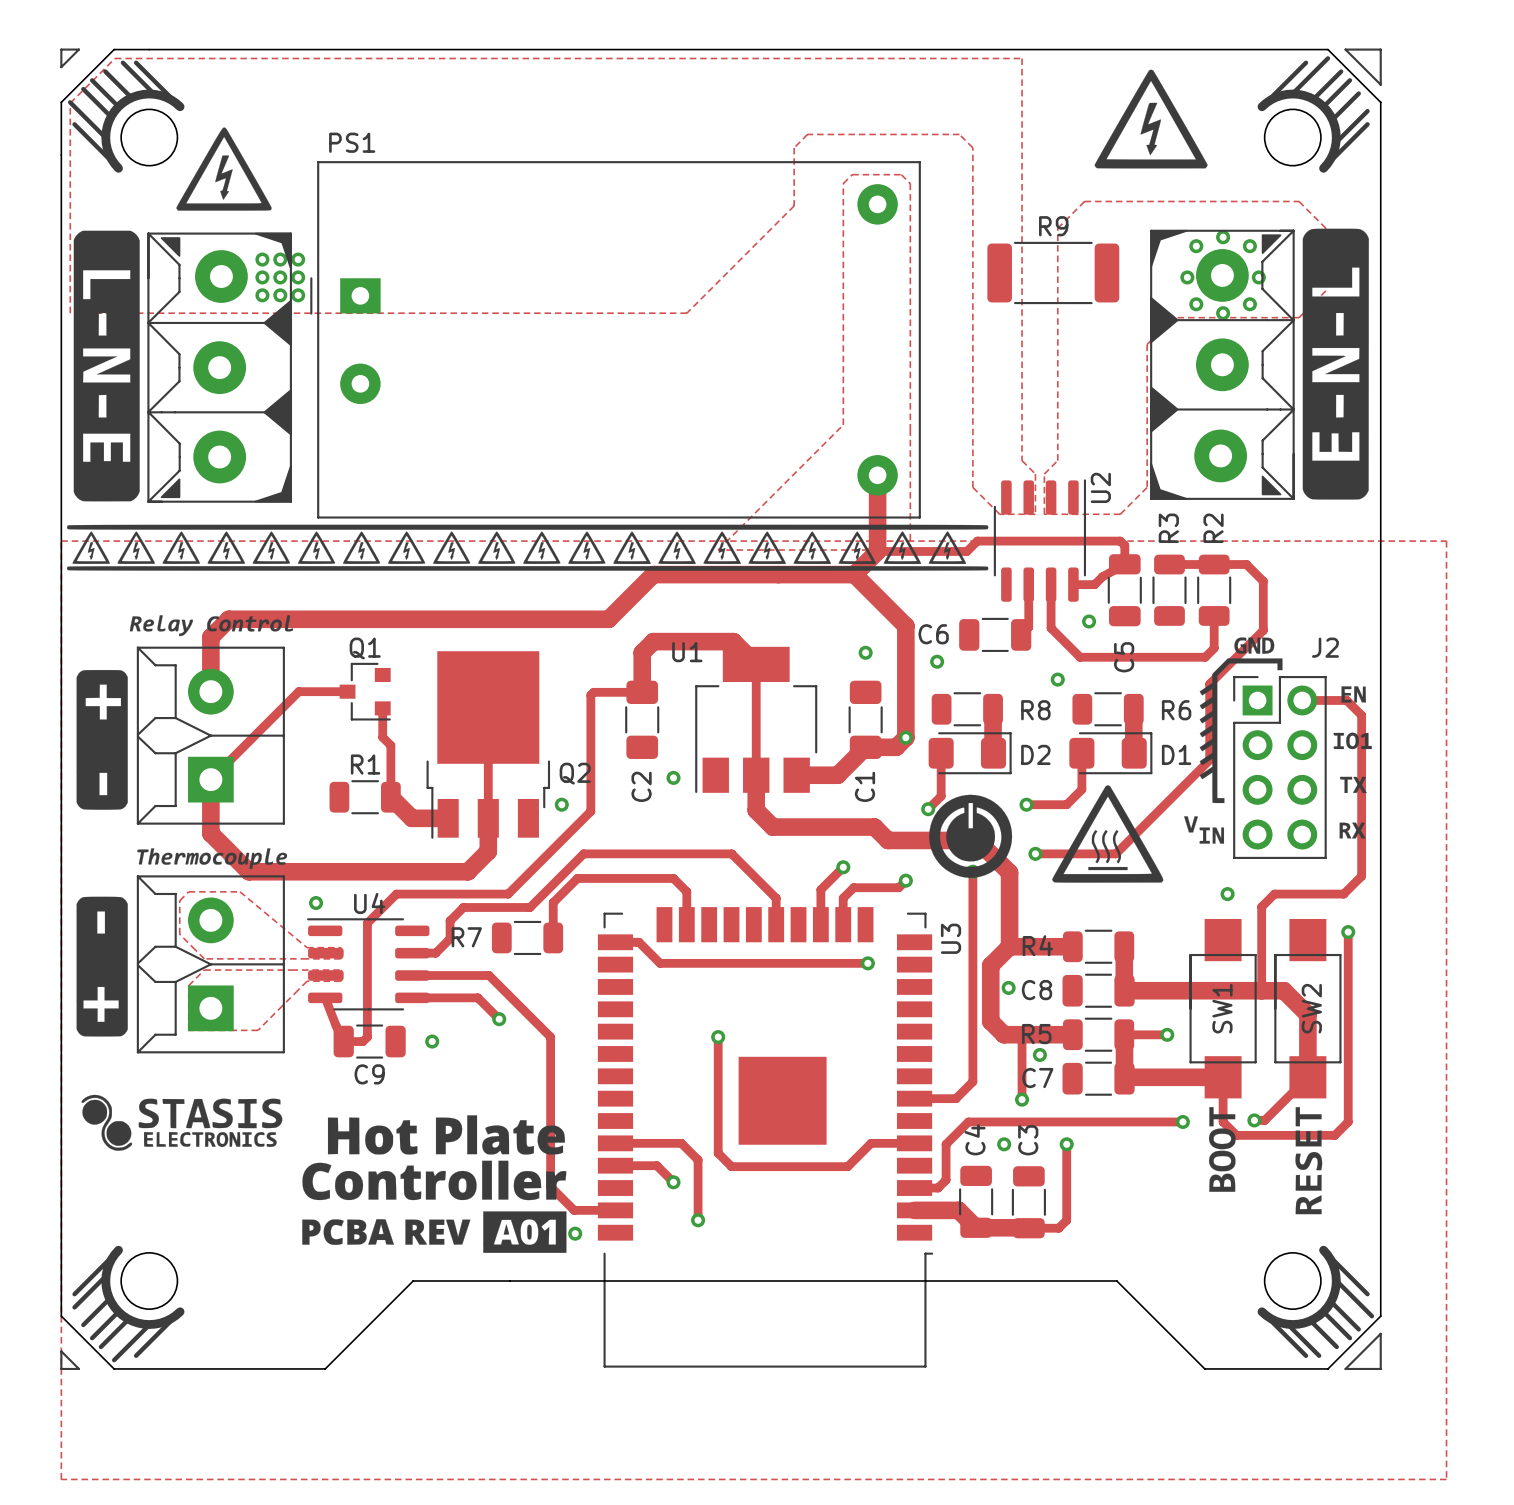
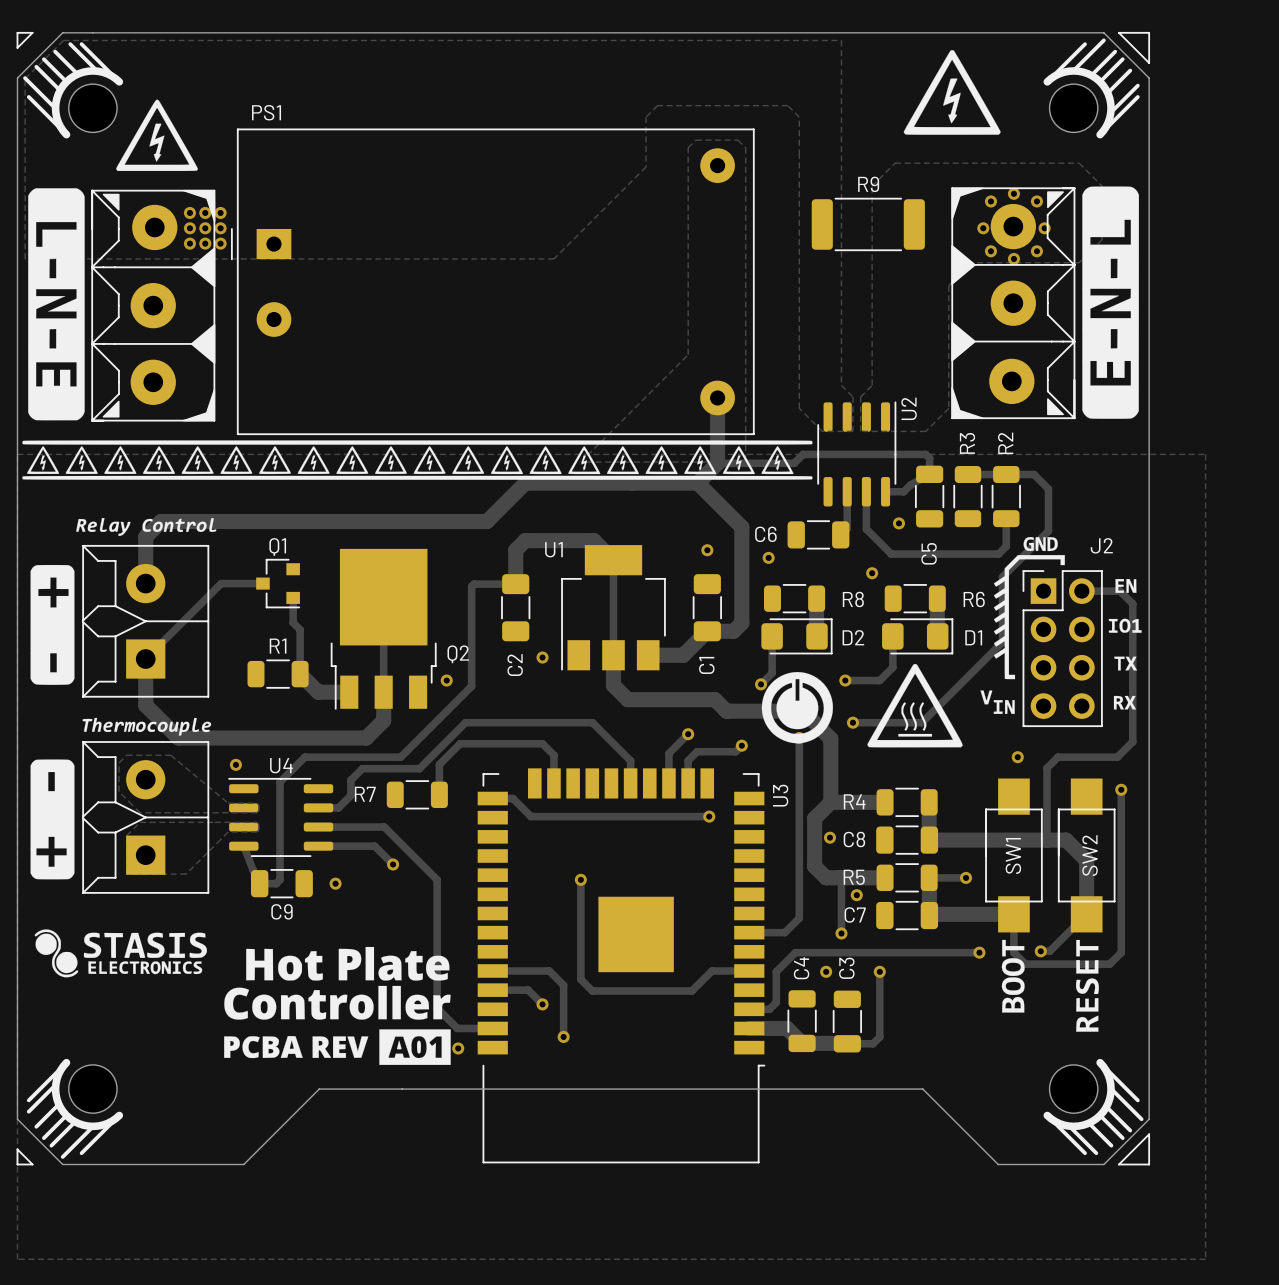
via: (905, 737) -> none

